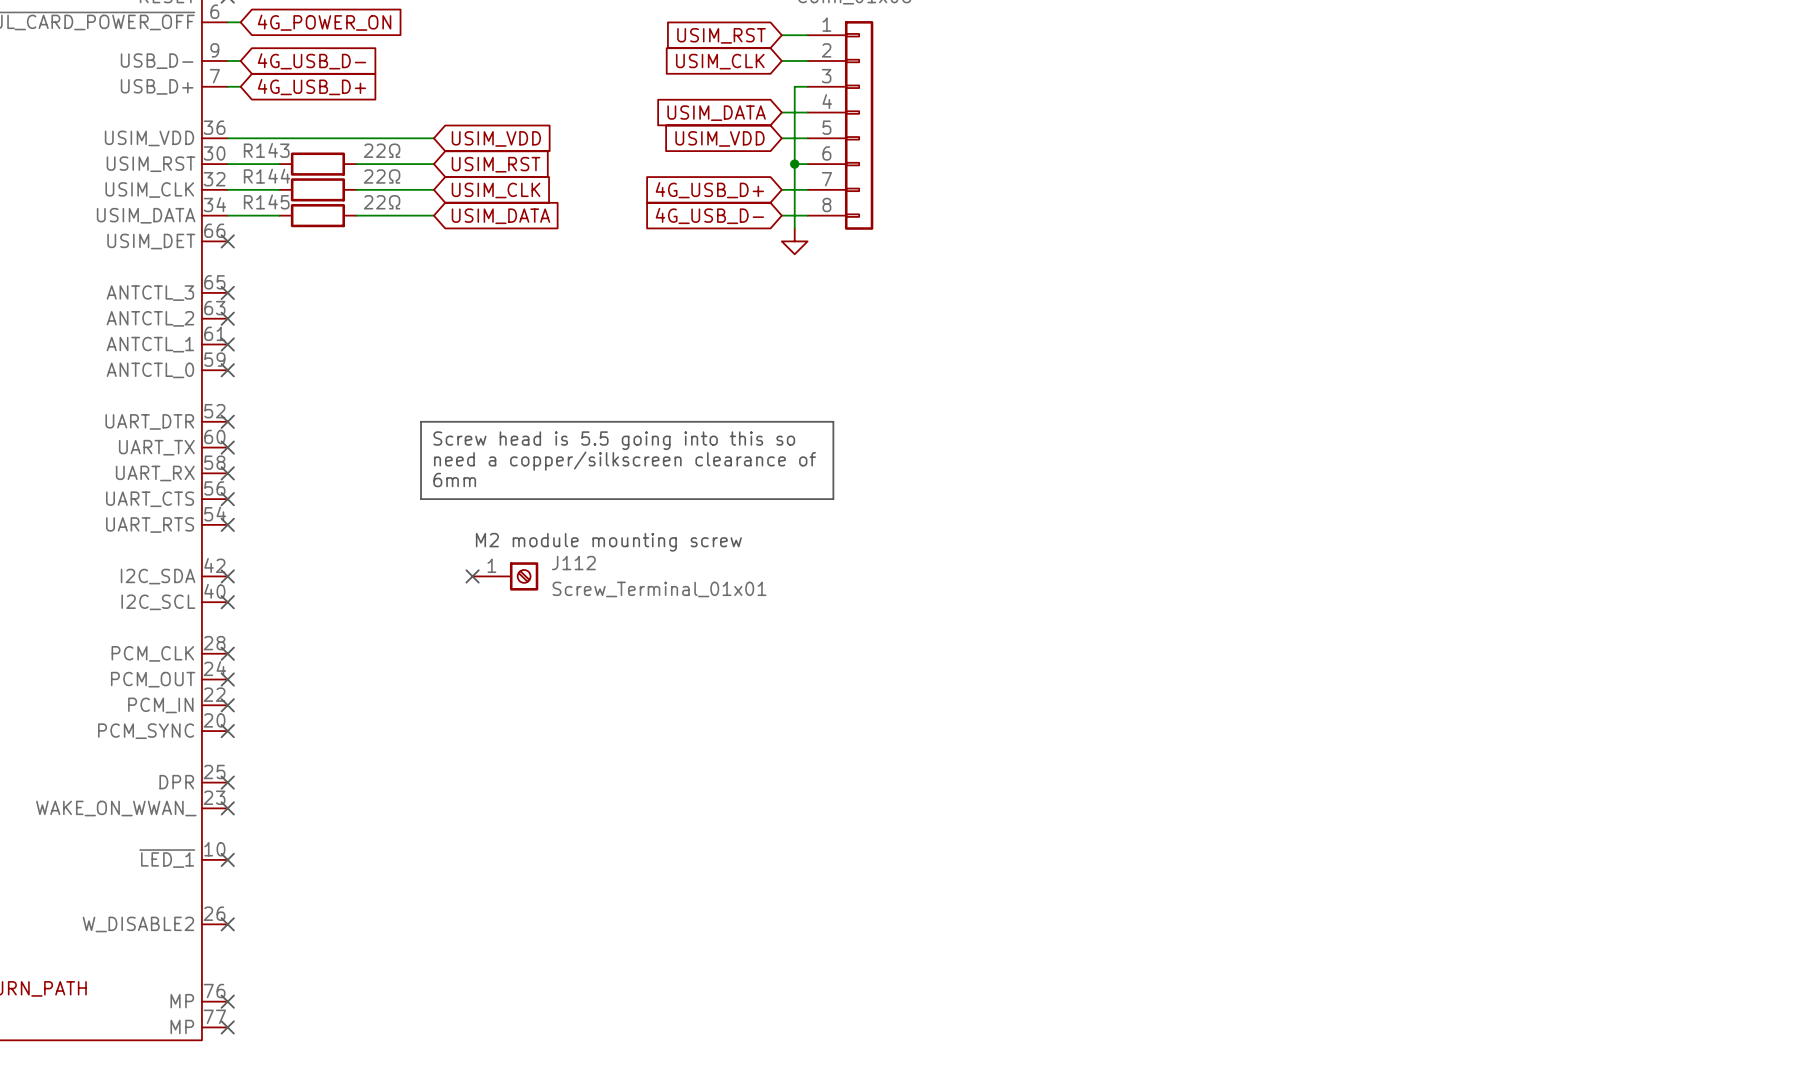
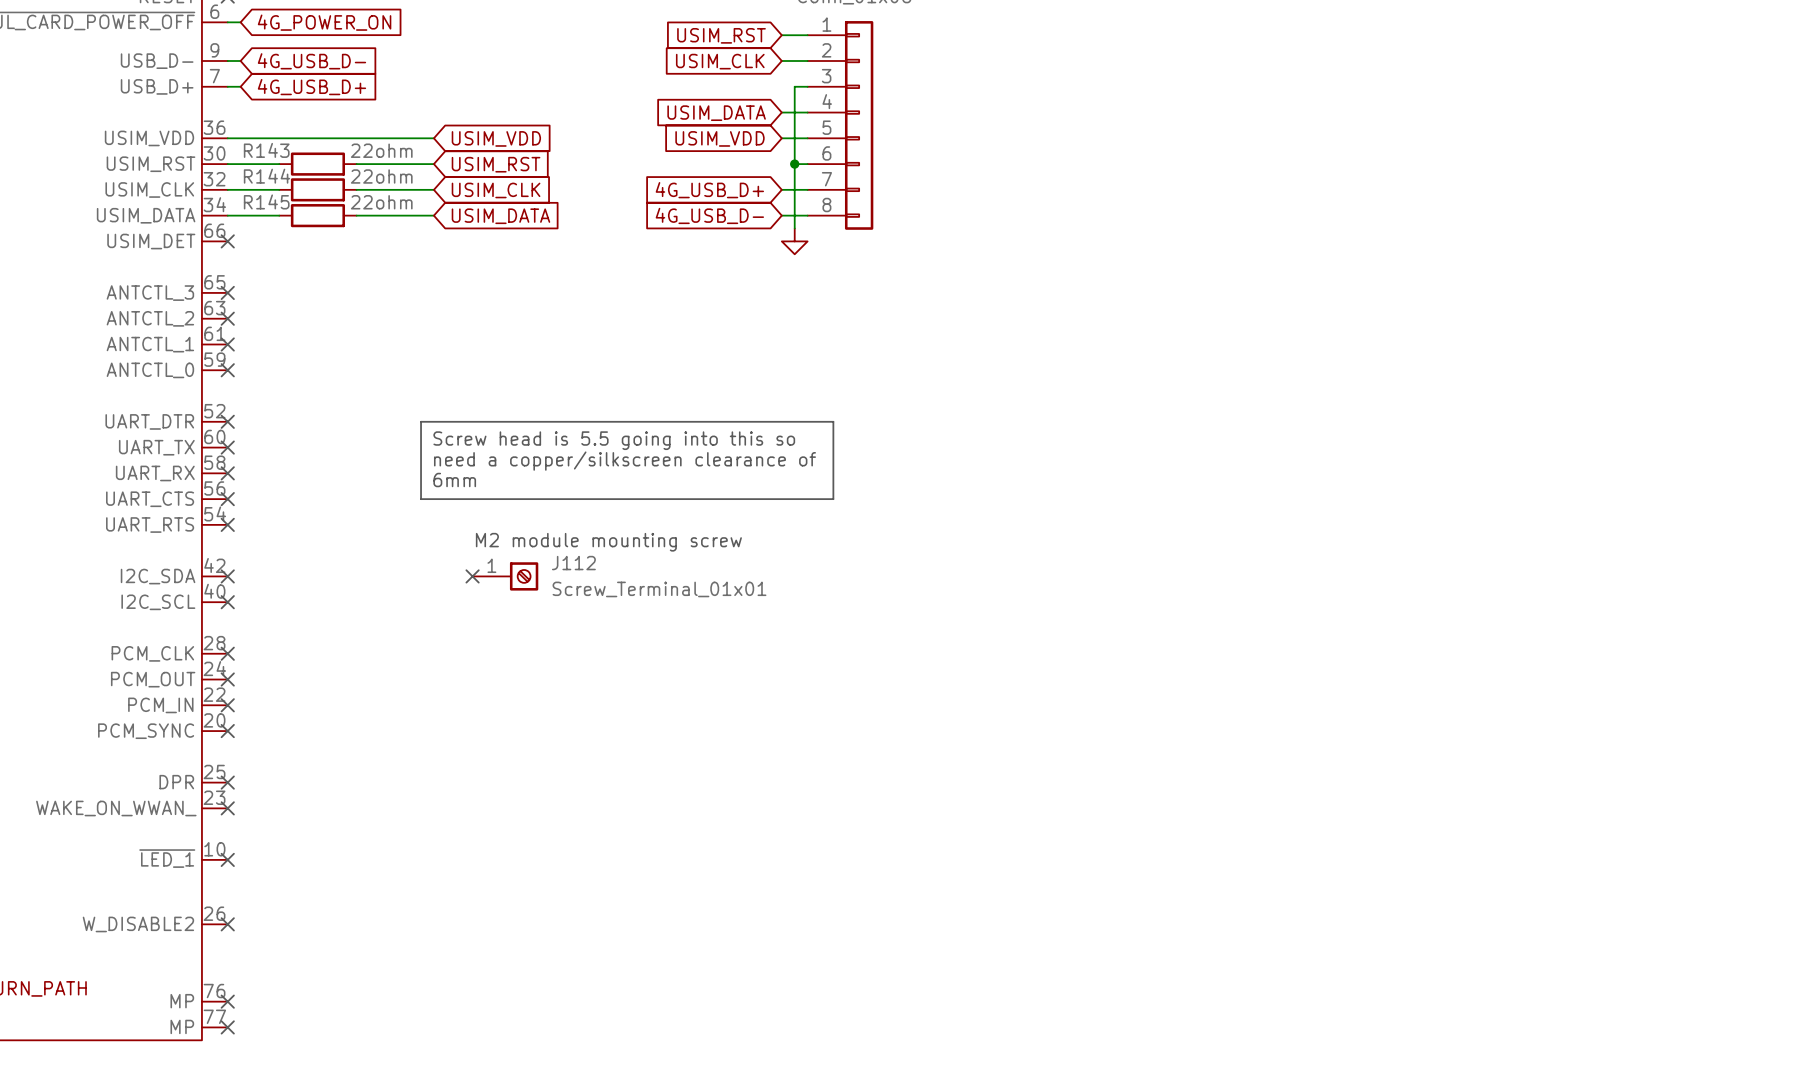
R143 value: 22Ω (382, 150) -> 22ohm (381, 150)
R144 value: 22Ω (382, 176) -> 22ohm (381, 176)
R145 value: 22Ω (382, 202) -> 22ohm (381, 202)

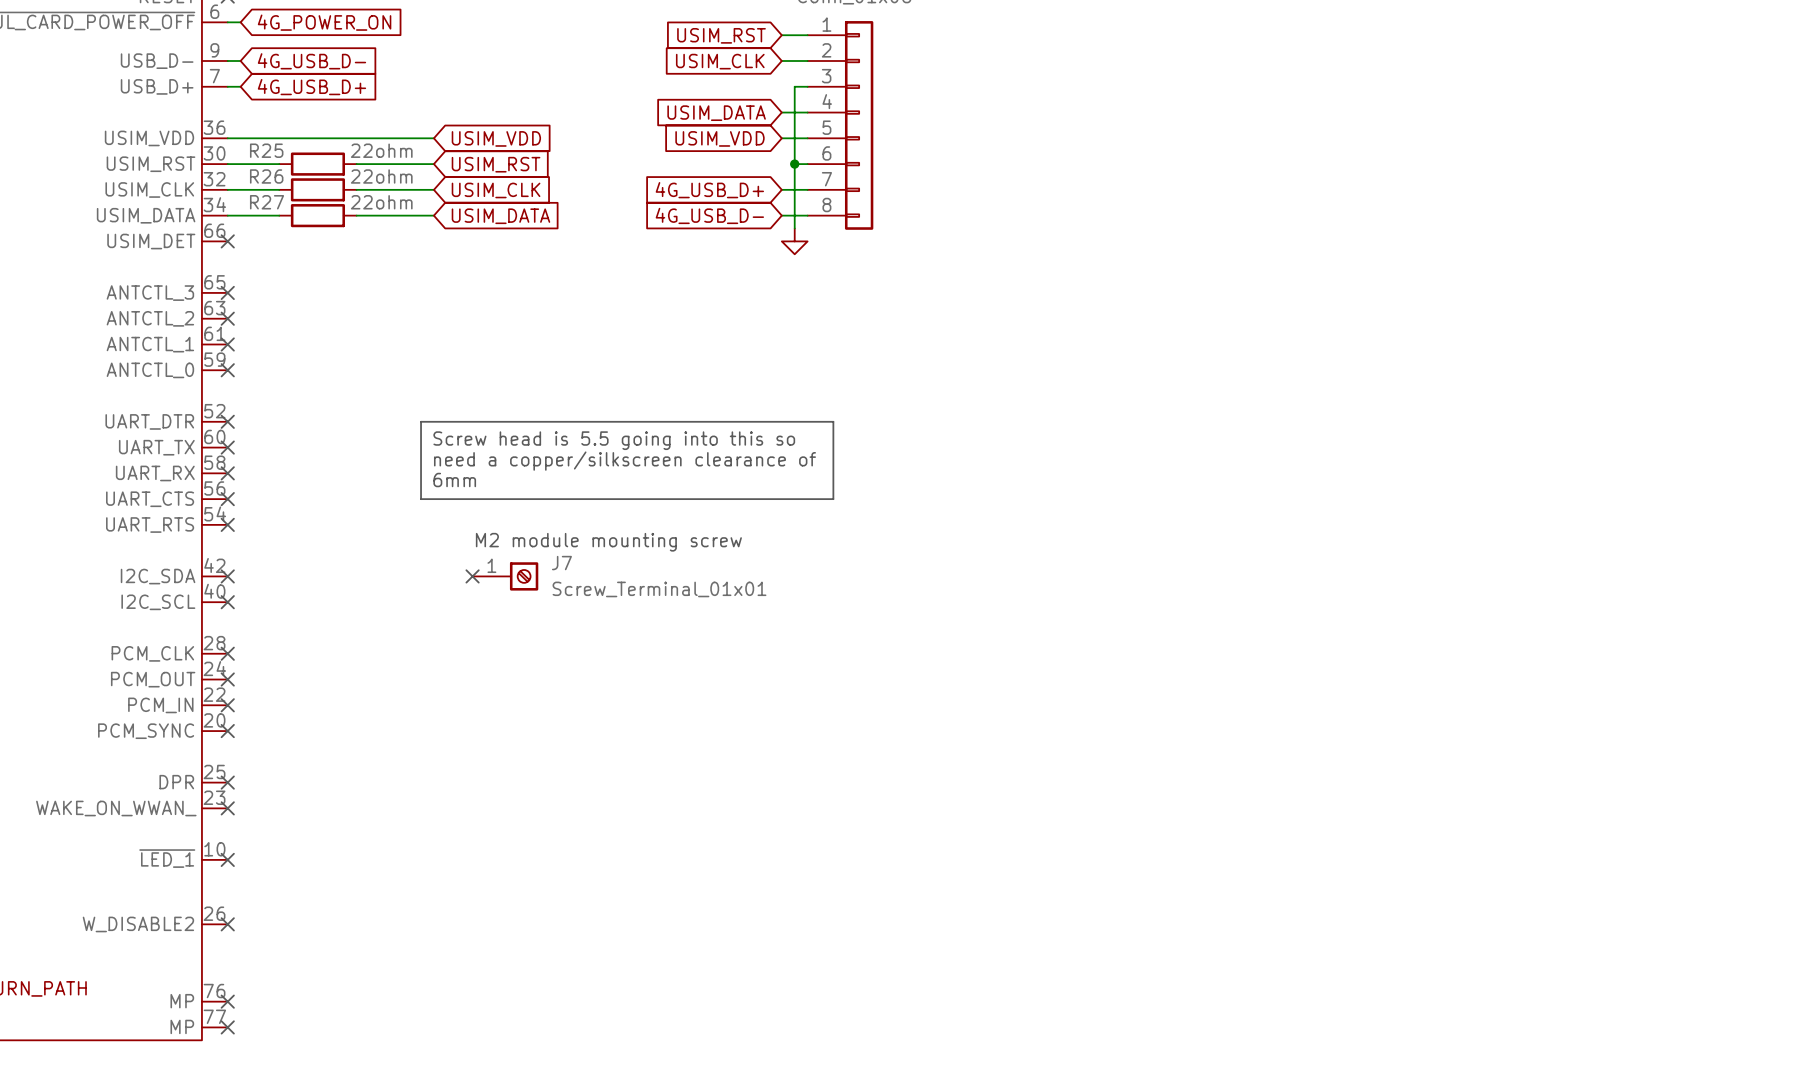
R143 name: R143 (266, 150) -> R25 (266, 150)
R144 name: R144 (267, 176) -> R26 (266, 176)
R145 name: R145 (266, 201) -> R27 (267, 202)
J112 name: J112 (573, 563) -> J7 (561, 563)

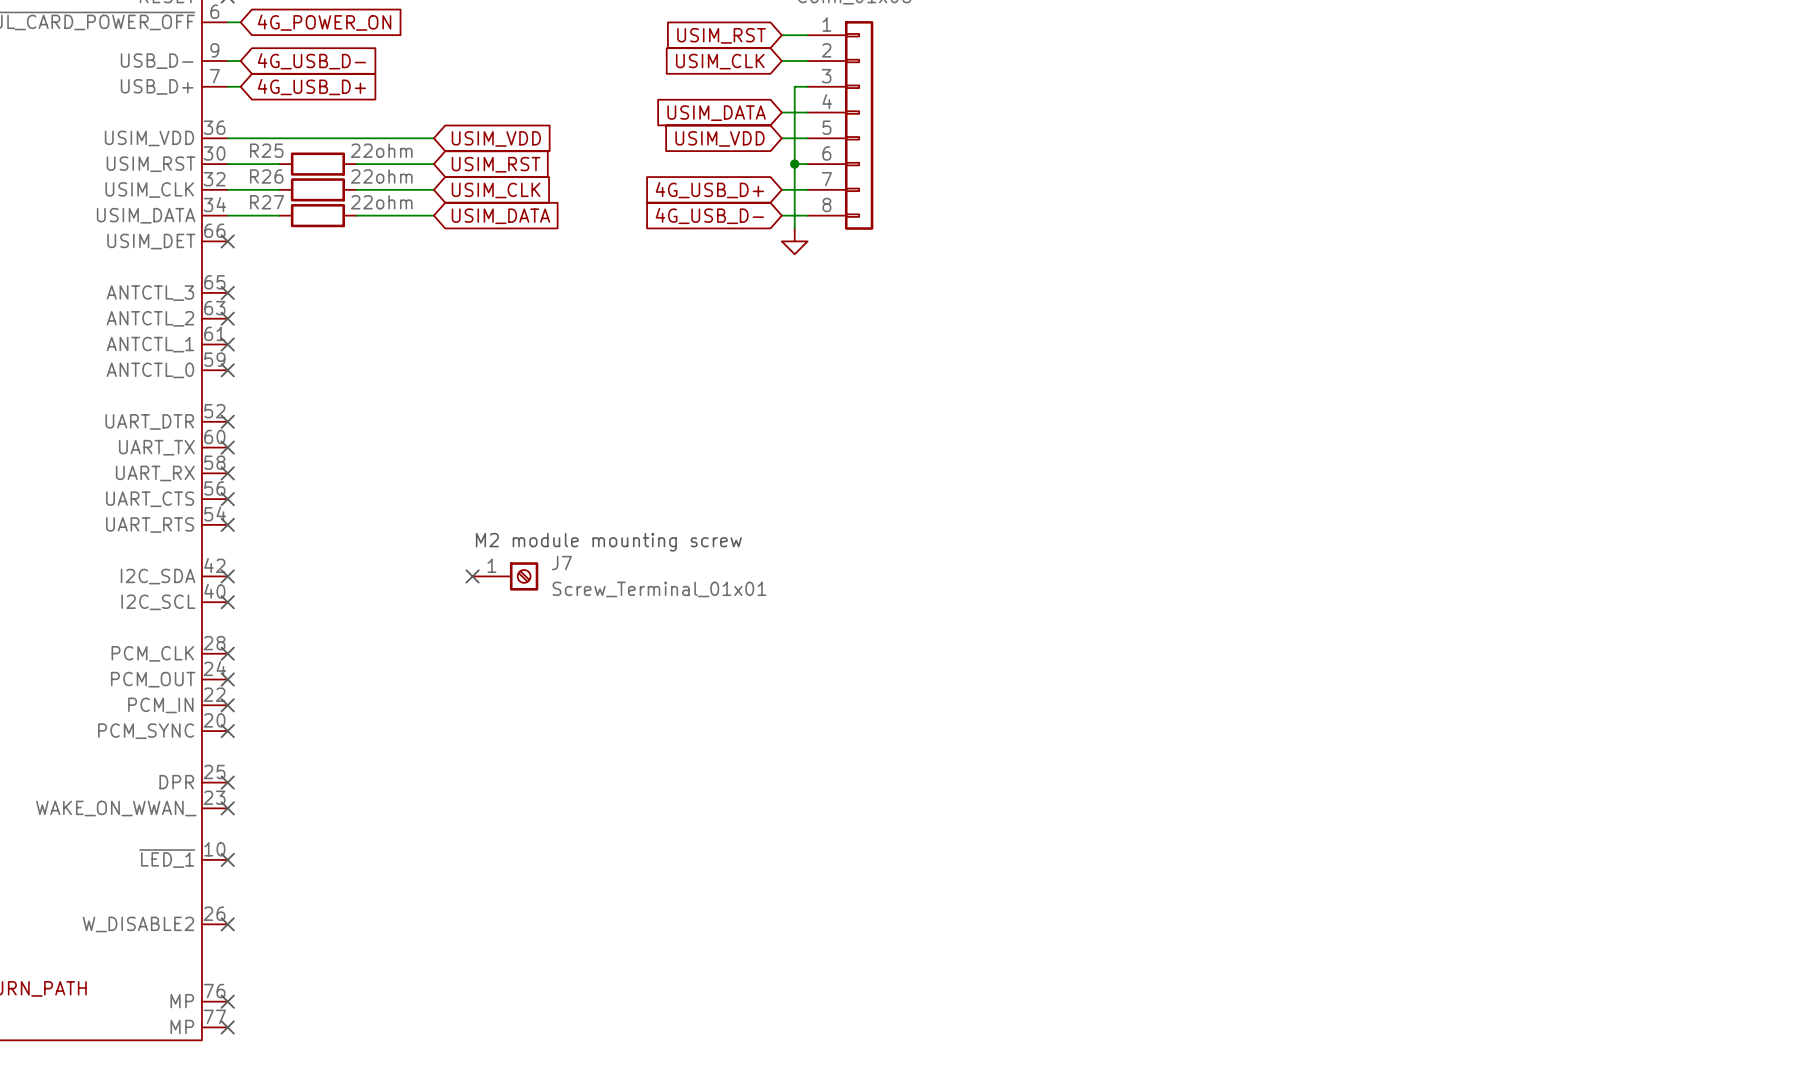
line: (421, 421) (833, 421) (833, 499) (421, 499) (421, 421) -> none
text: Screw head is 5.5 going into this so (614, 440) -> none
text: need a copper/silkscreen clearance of (624, 461) -> none
text: 6mm (454, 480) -> none

